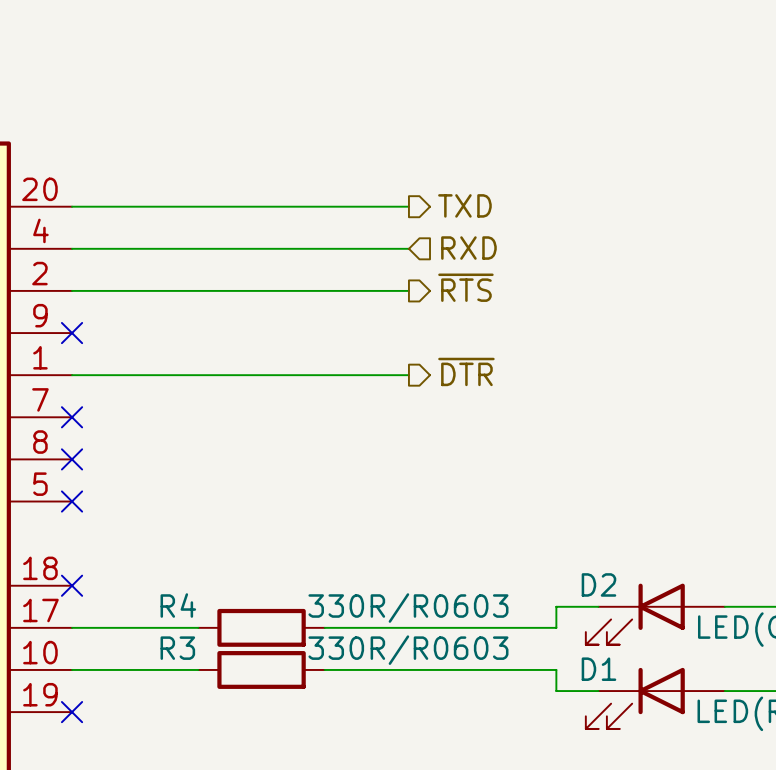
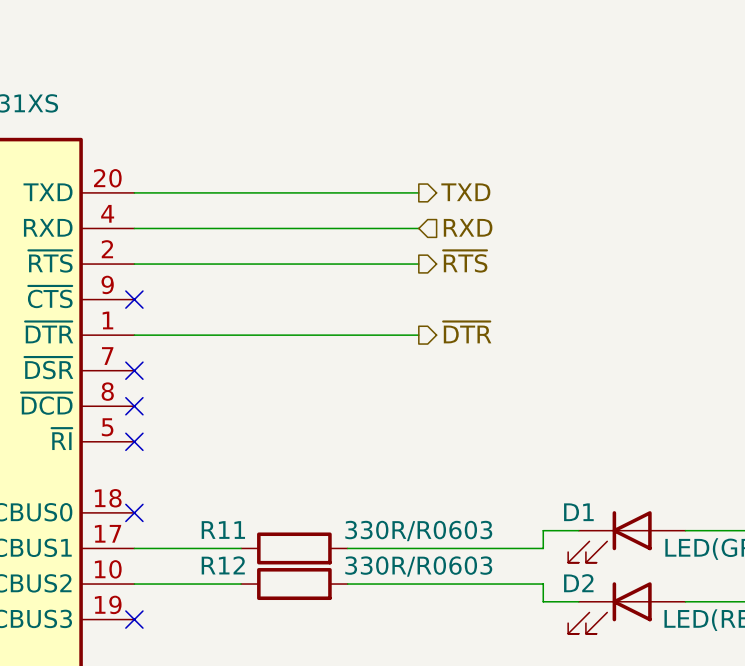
D2 name: D2 (598, 584) -> D1 (578, 512)
R4 name: R4 (178, 605) -> R11 (223, 530)
R3 name: R3 (177, 648) -> R12 (223, 565)
D1 name: D1 (598, 669) -> D2 (578, 583)

